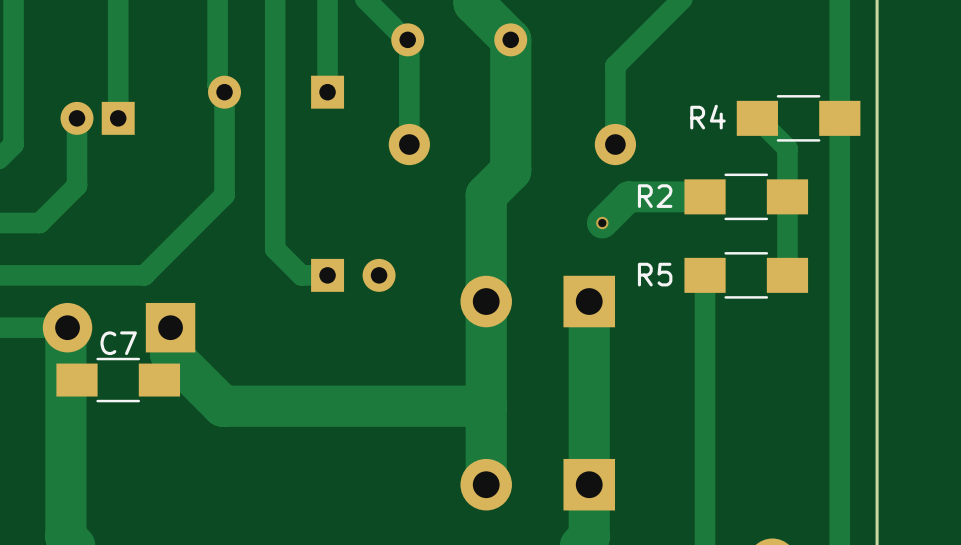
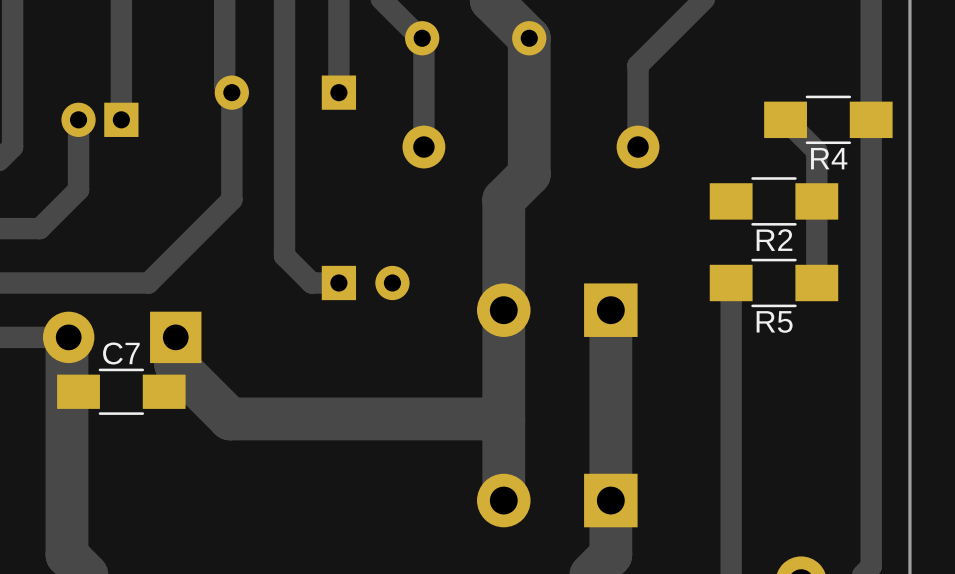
R4 name position: R4 (707, 117) -> R4 (829, 158)
R2 name position: R2 (655, 196) -> R2 (774, 240)
track: (705, 196) (628, 196) (602, 223) -> none
via: (602, 223) -> none
R5 name position: R5 (655, 274) -> R5 (774, 321)

